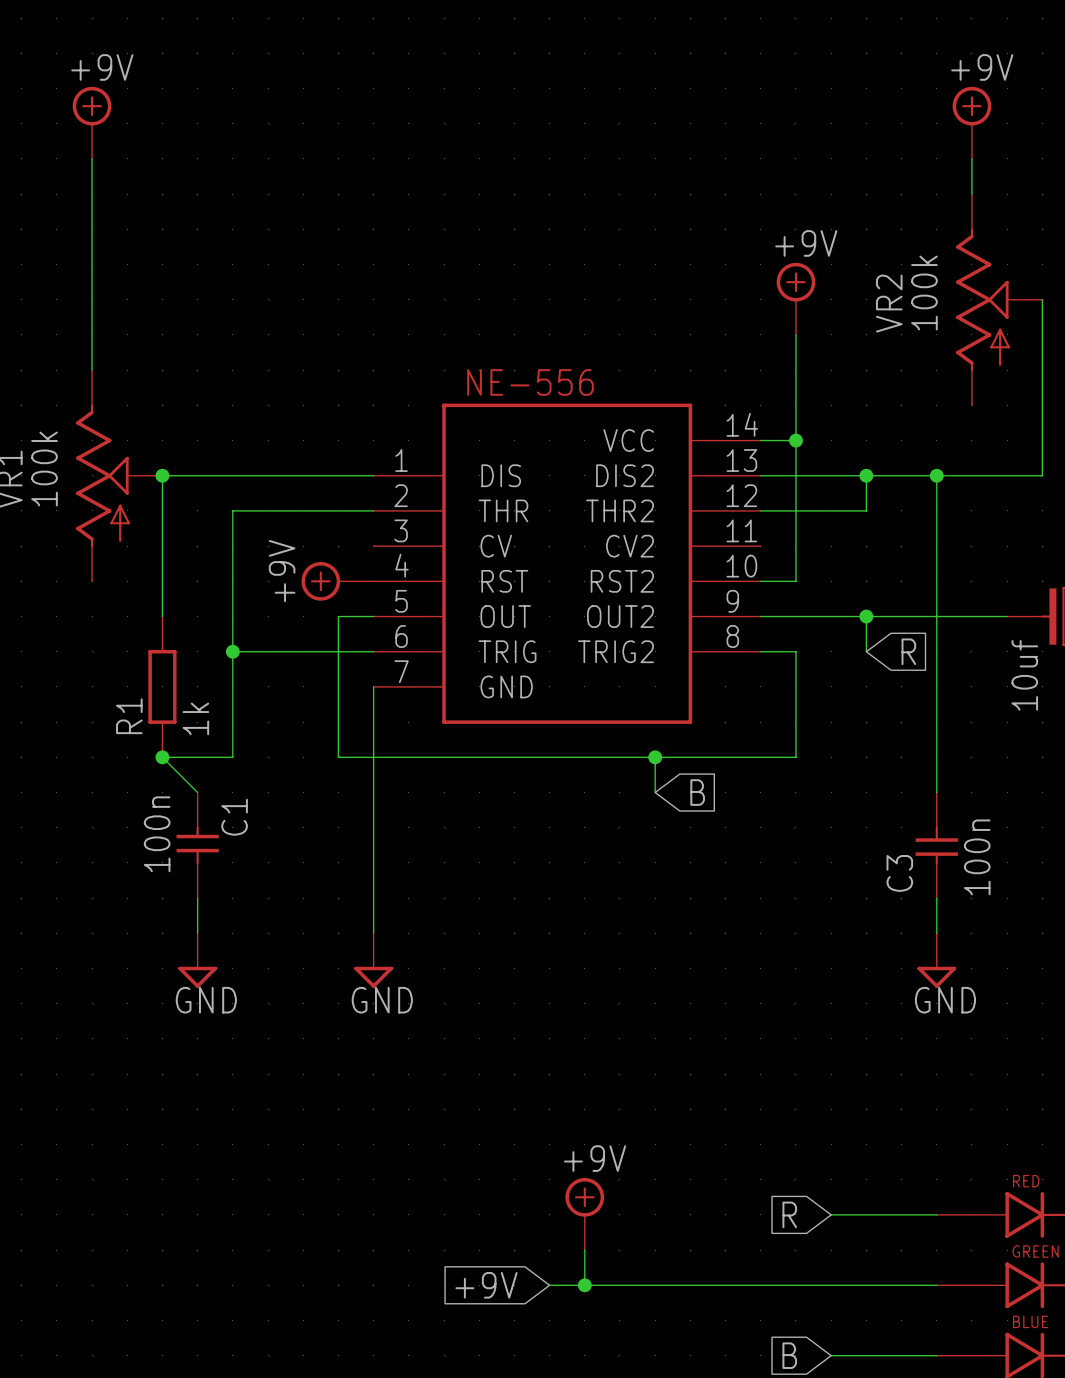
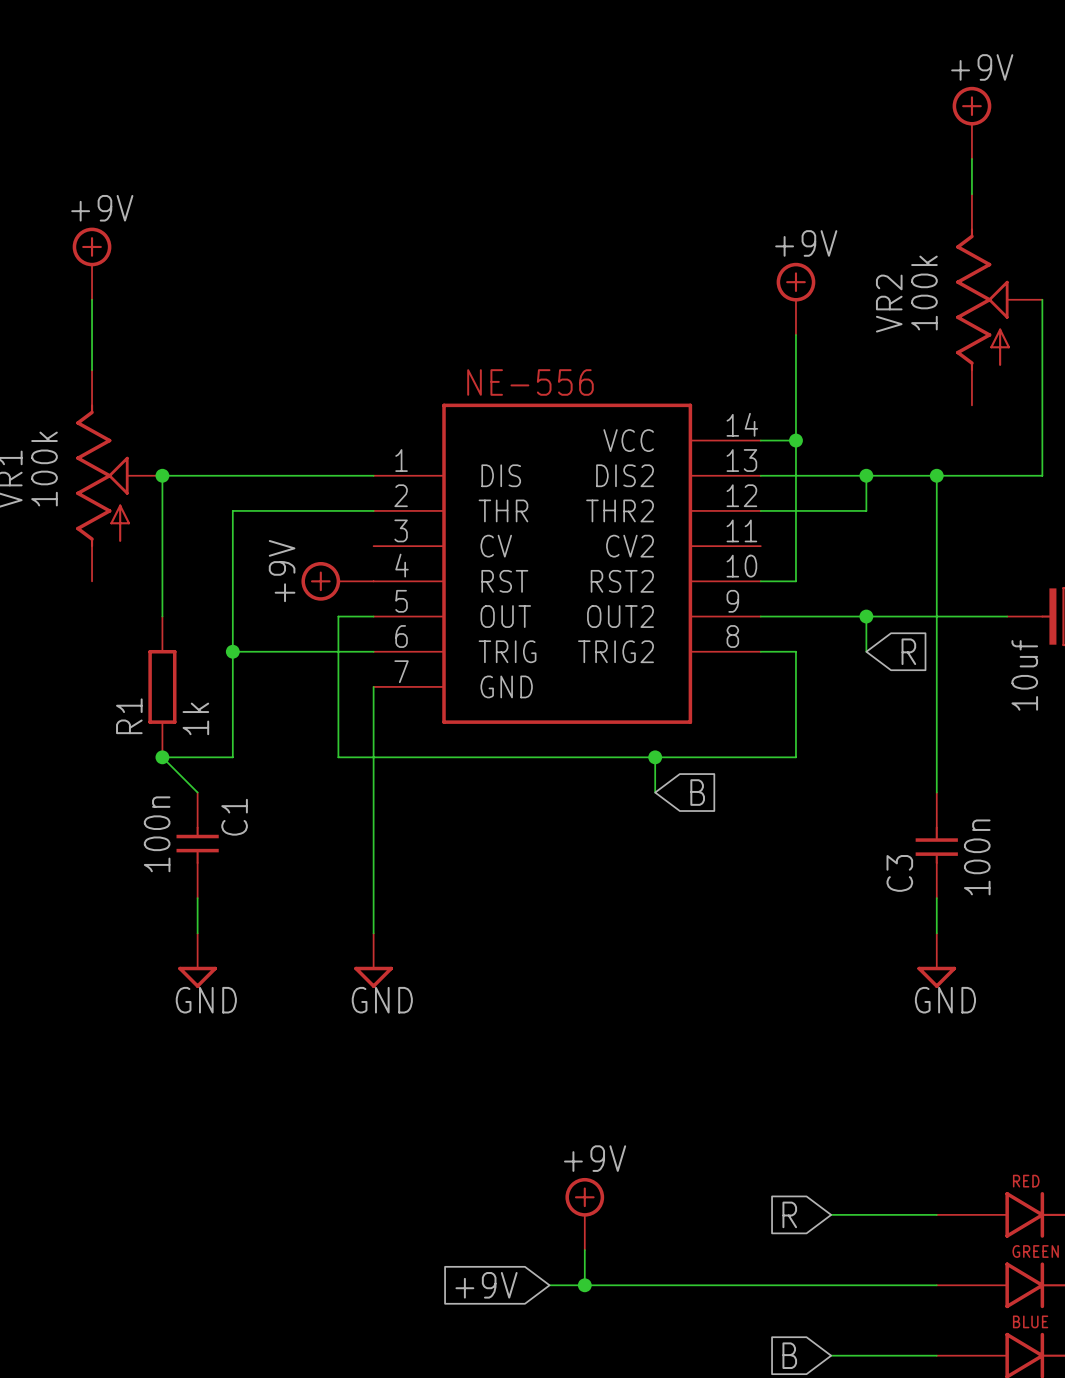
power symbol position: +9V (92, 122) -> +9V (92, 263)
wire: (92, 158) (92, 299) -> none

